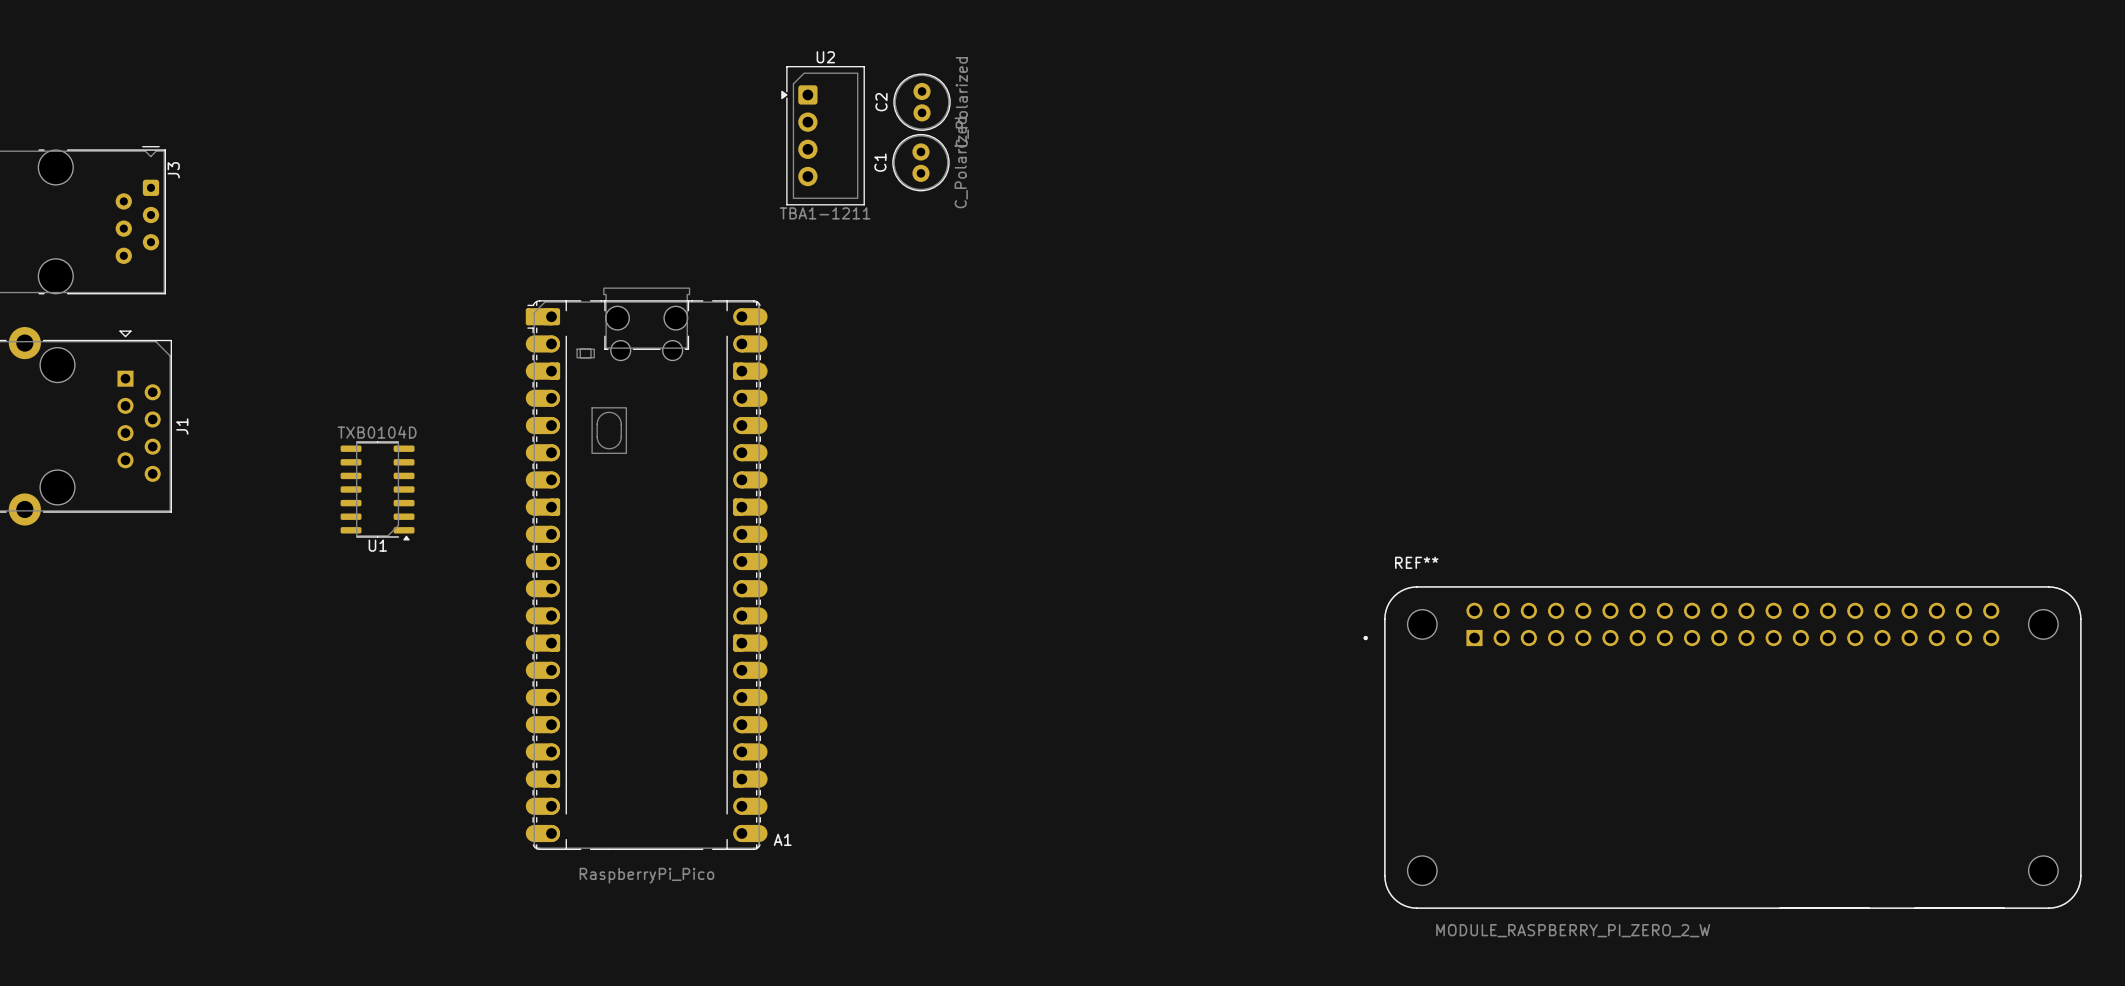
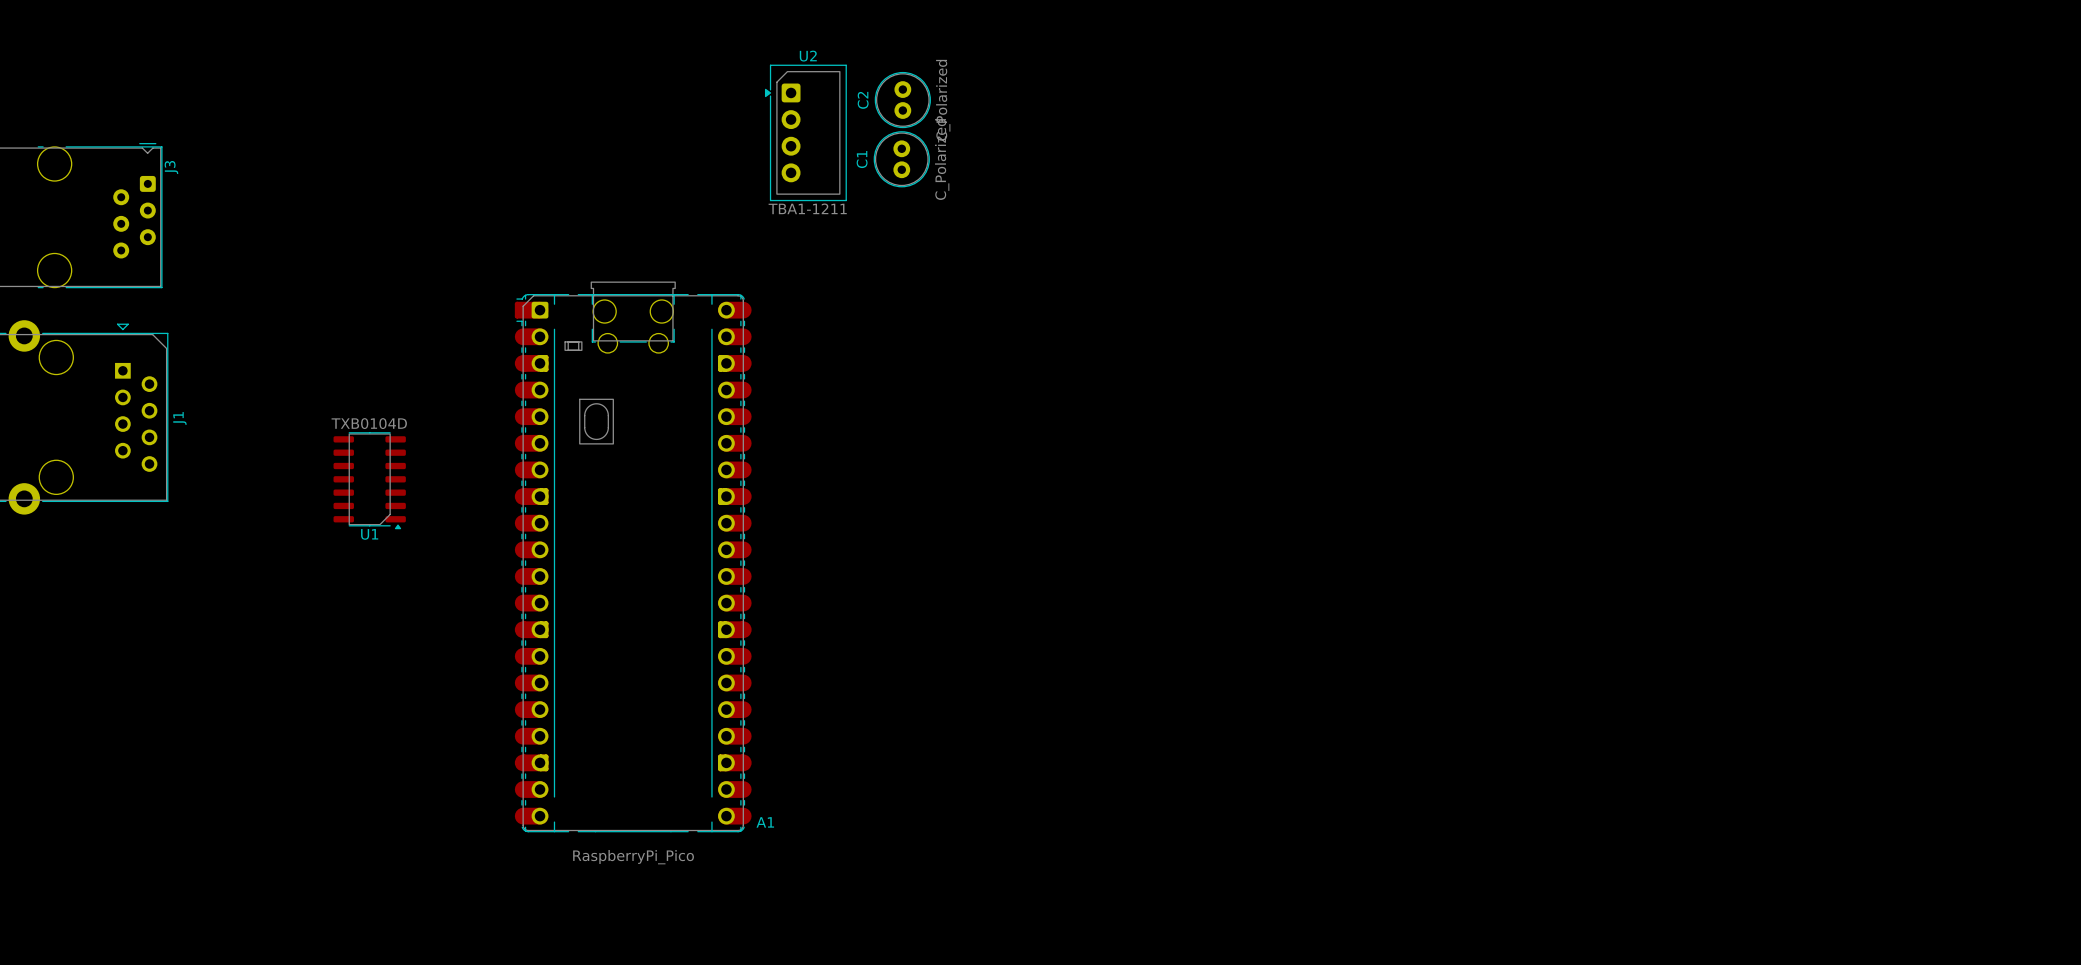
REF**: MODULE_RASPBERRY_PI_ZERO_2_W (1722, 747) -> none

